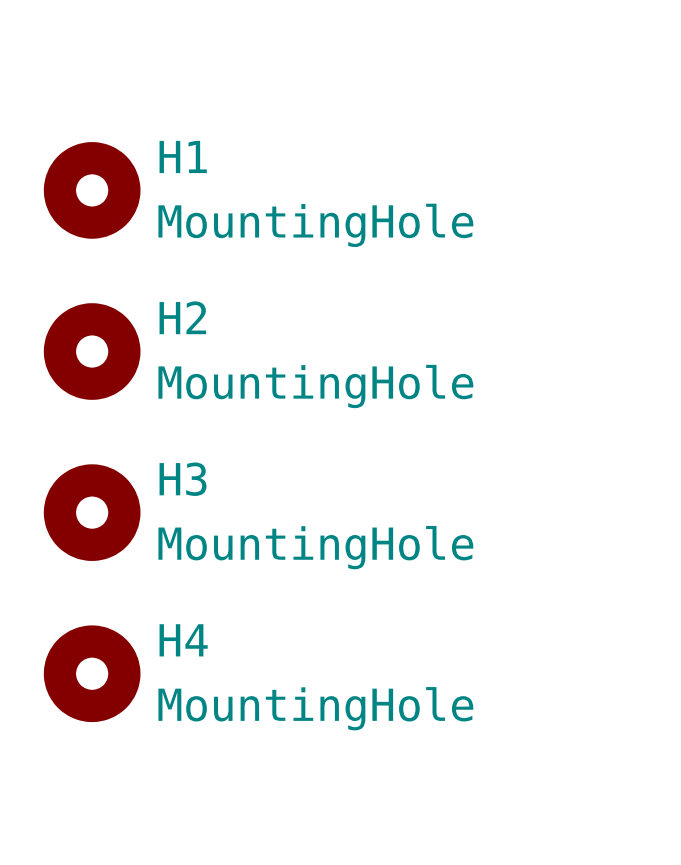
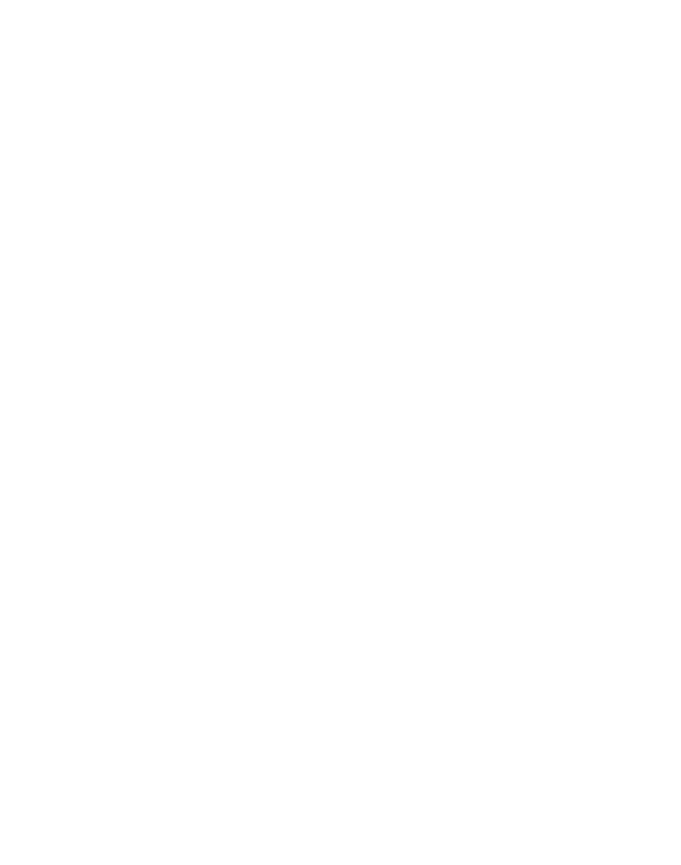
H1: MountingHole (92, 190) -> none
H2: MountingHole (92, 351) -> none
H3: MountingHole (92, 512) -> none
H4: MountingHole (92, 673) -> none

